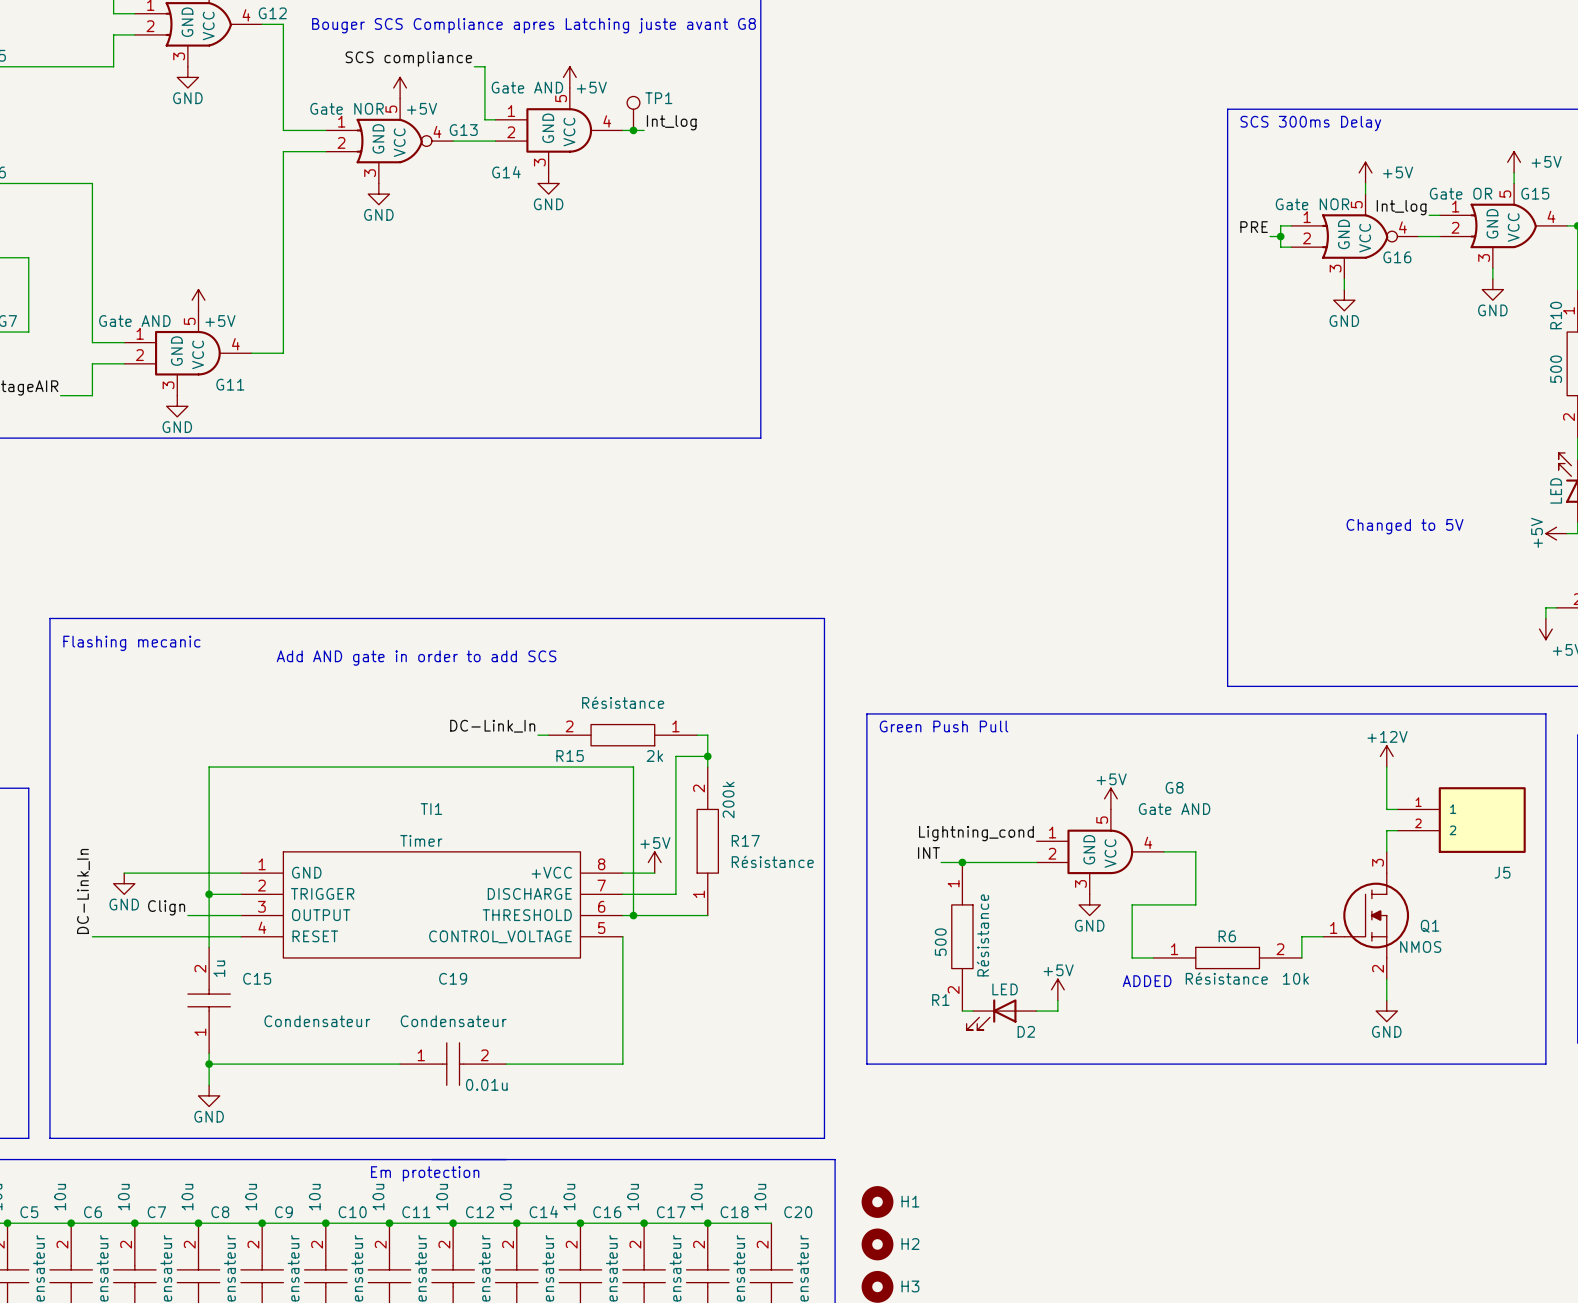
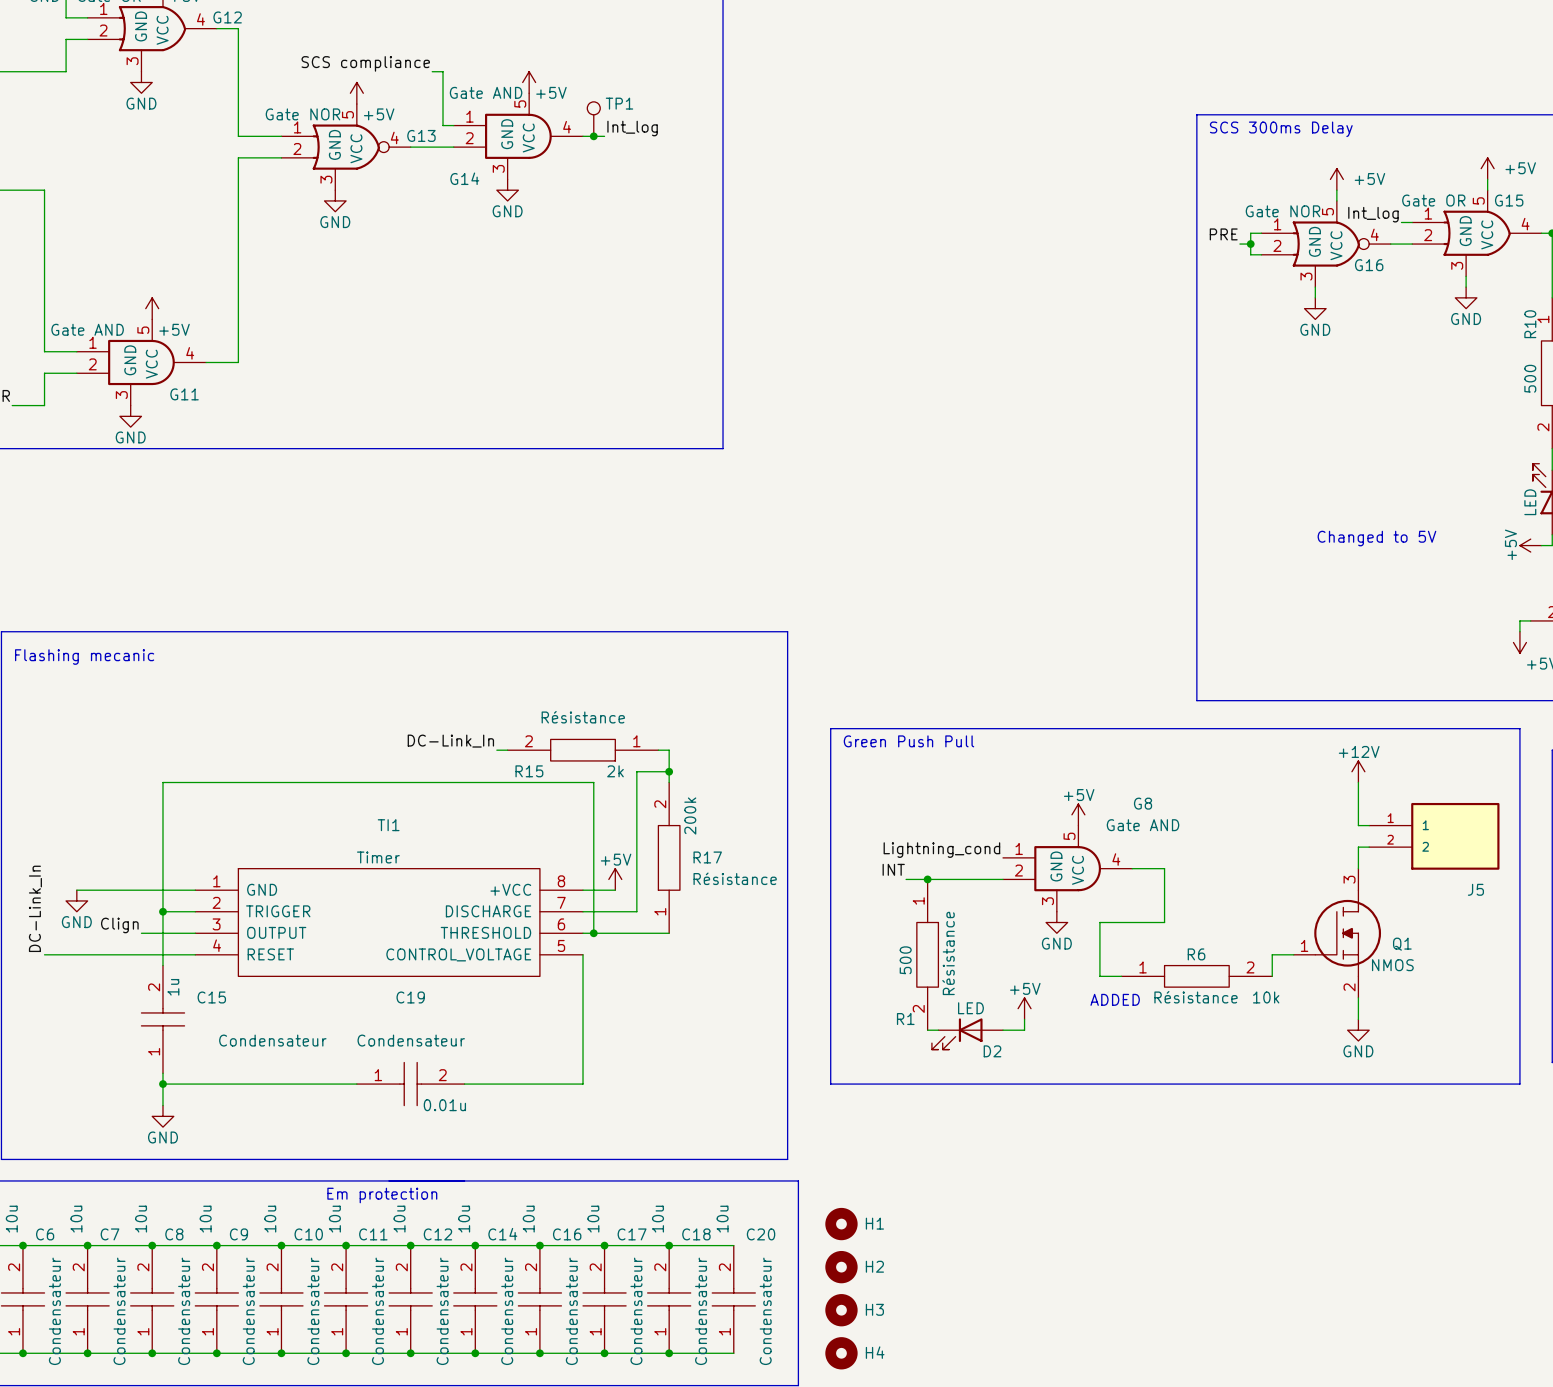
text: Bouger SCS Compliance apres Latching juste avant G8 (534, 25) -> none
text: Add AND gate in order to add SCS (416, 658) -> none

